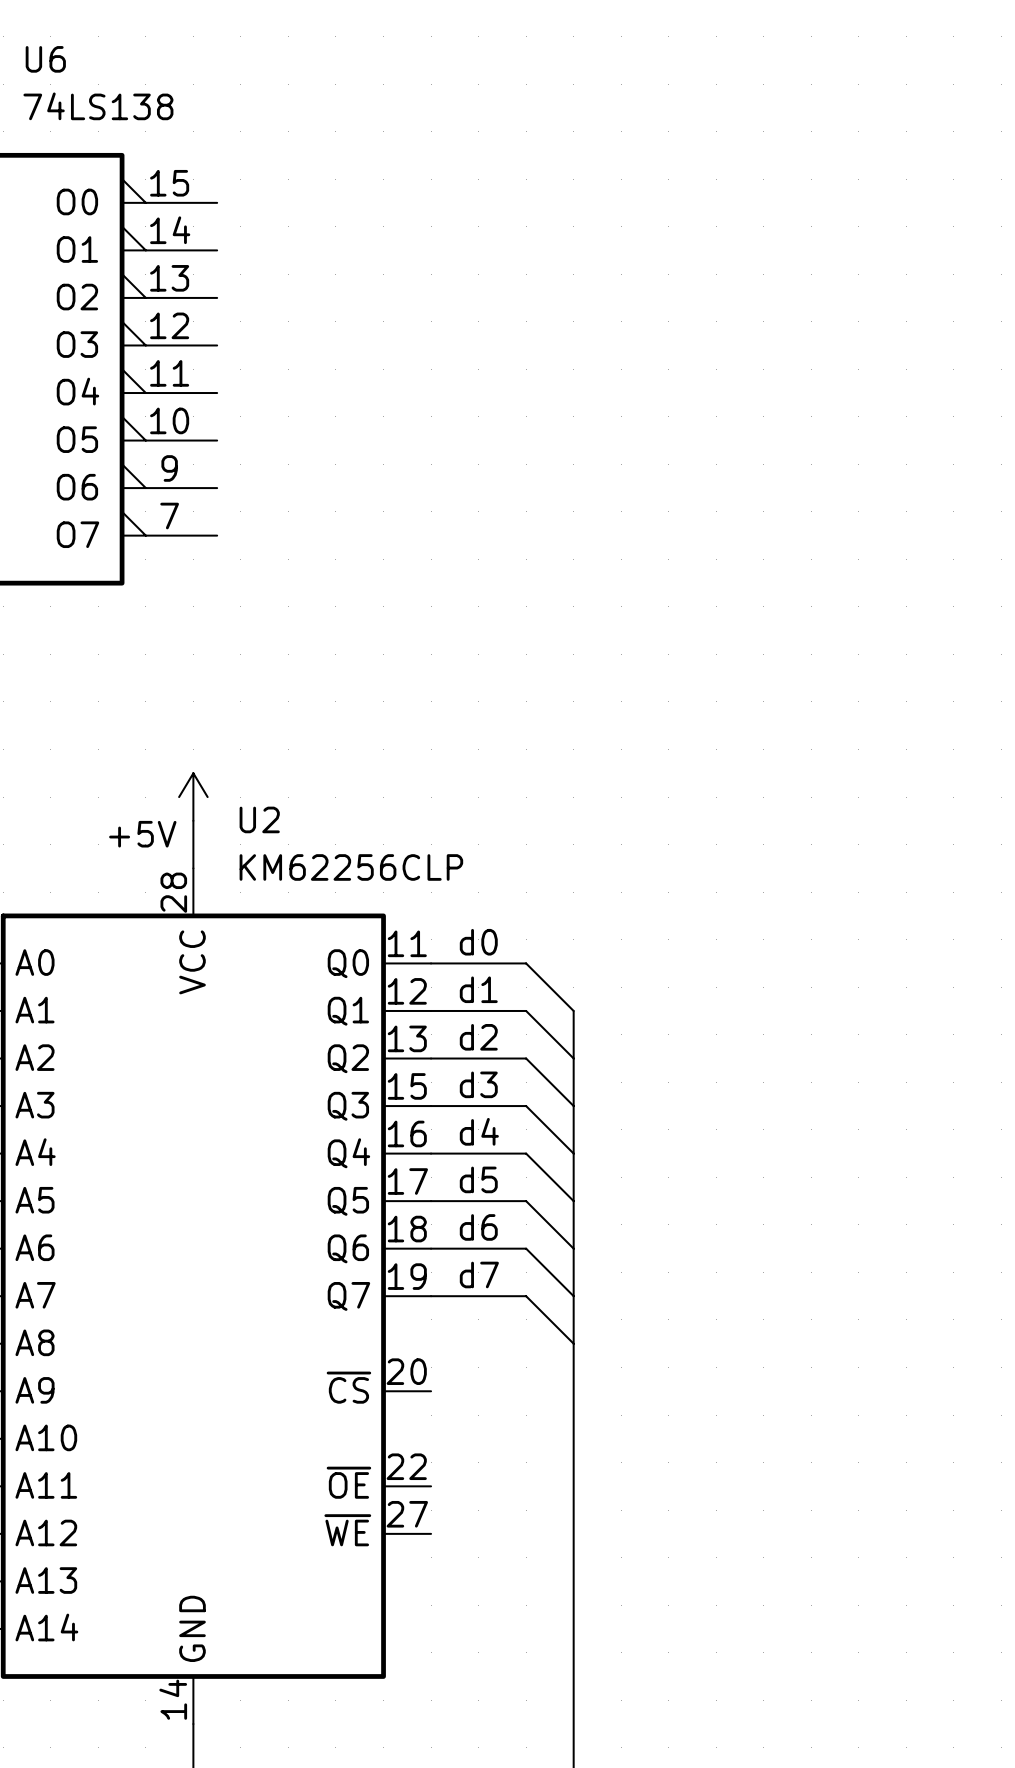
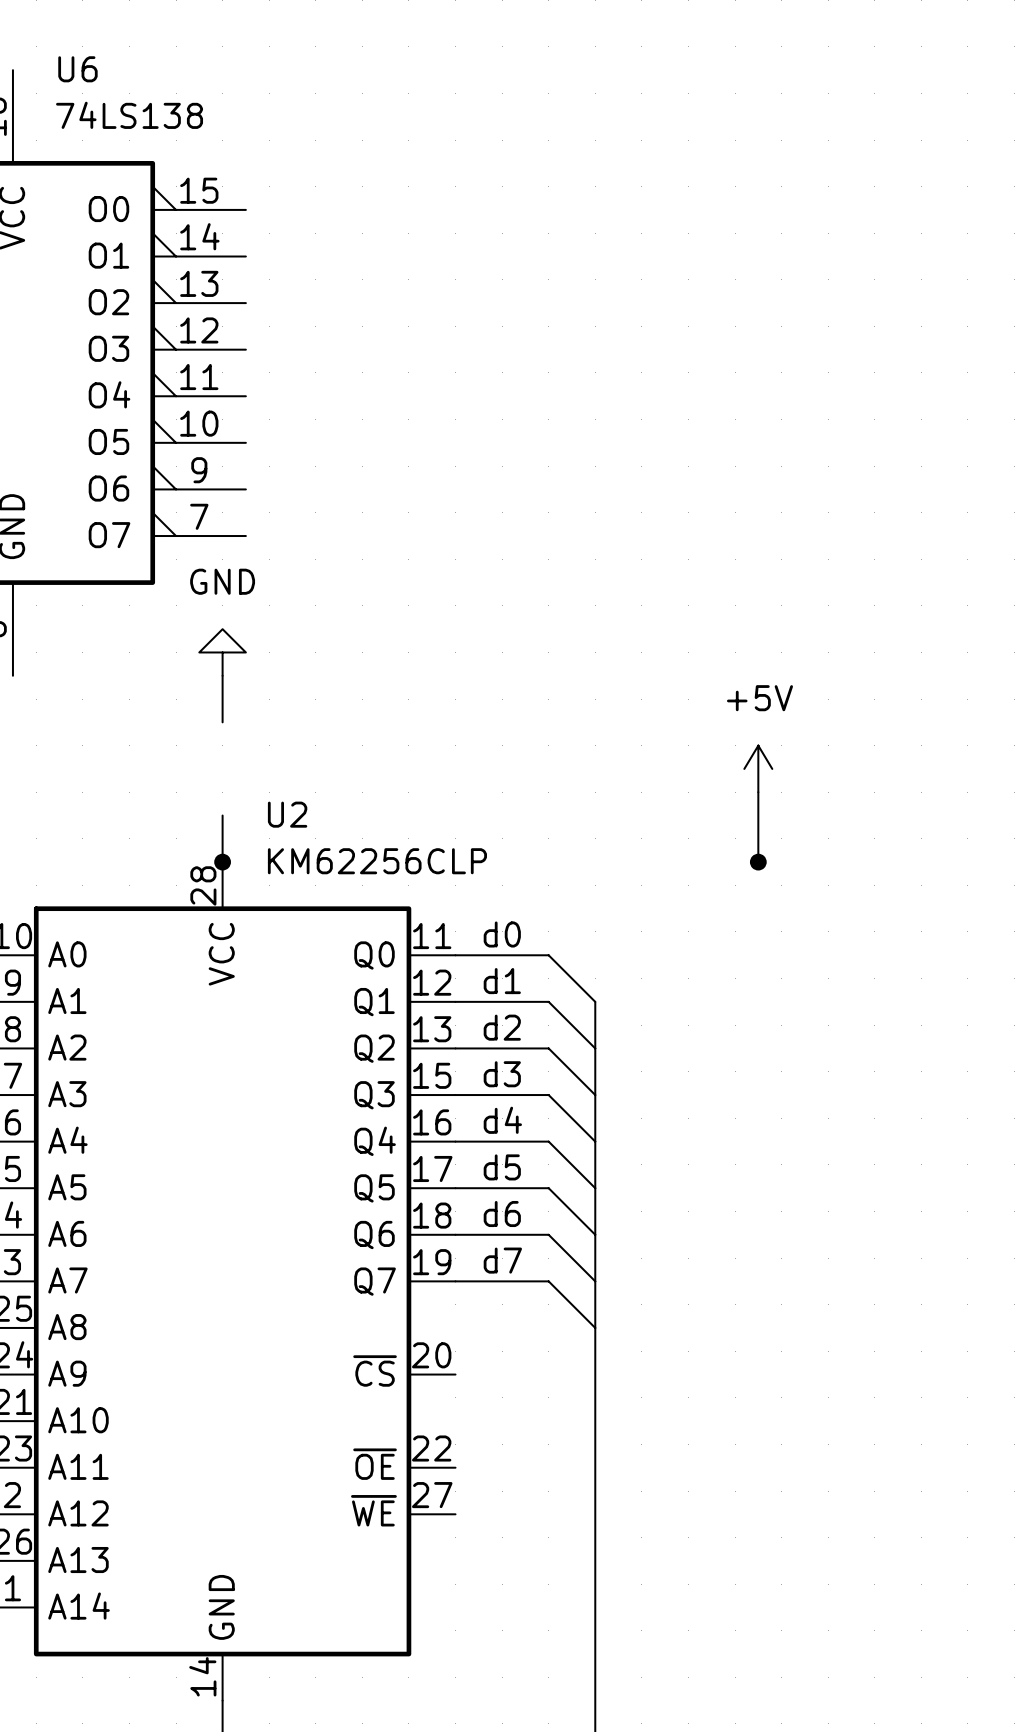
power symbol: none -> GND (222, 652)
wire: none -> (222, 675) (222, 722)
power symbol: none -> +5V (758, 768)
power symbol: +5V (193, 797) -> none
wire: none -> (758, 792) (758, 862)
junction: none -> (222, 862)
junction: none -> (758, 862)

